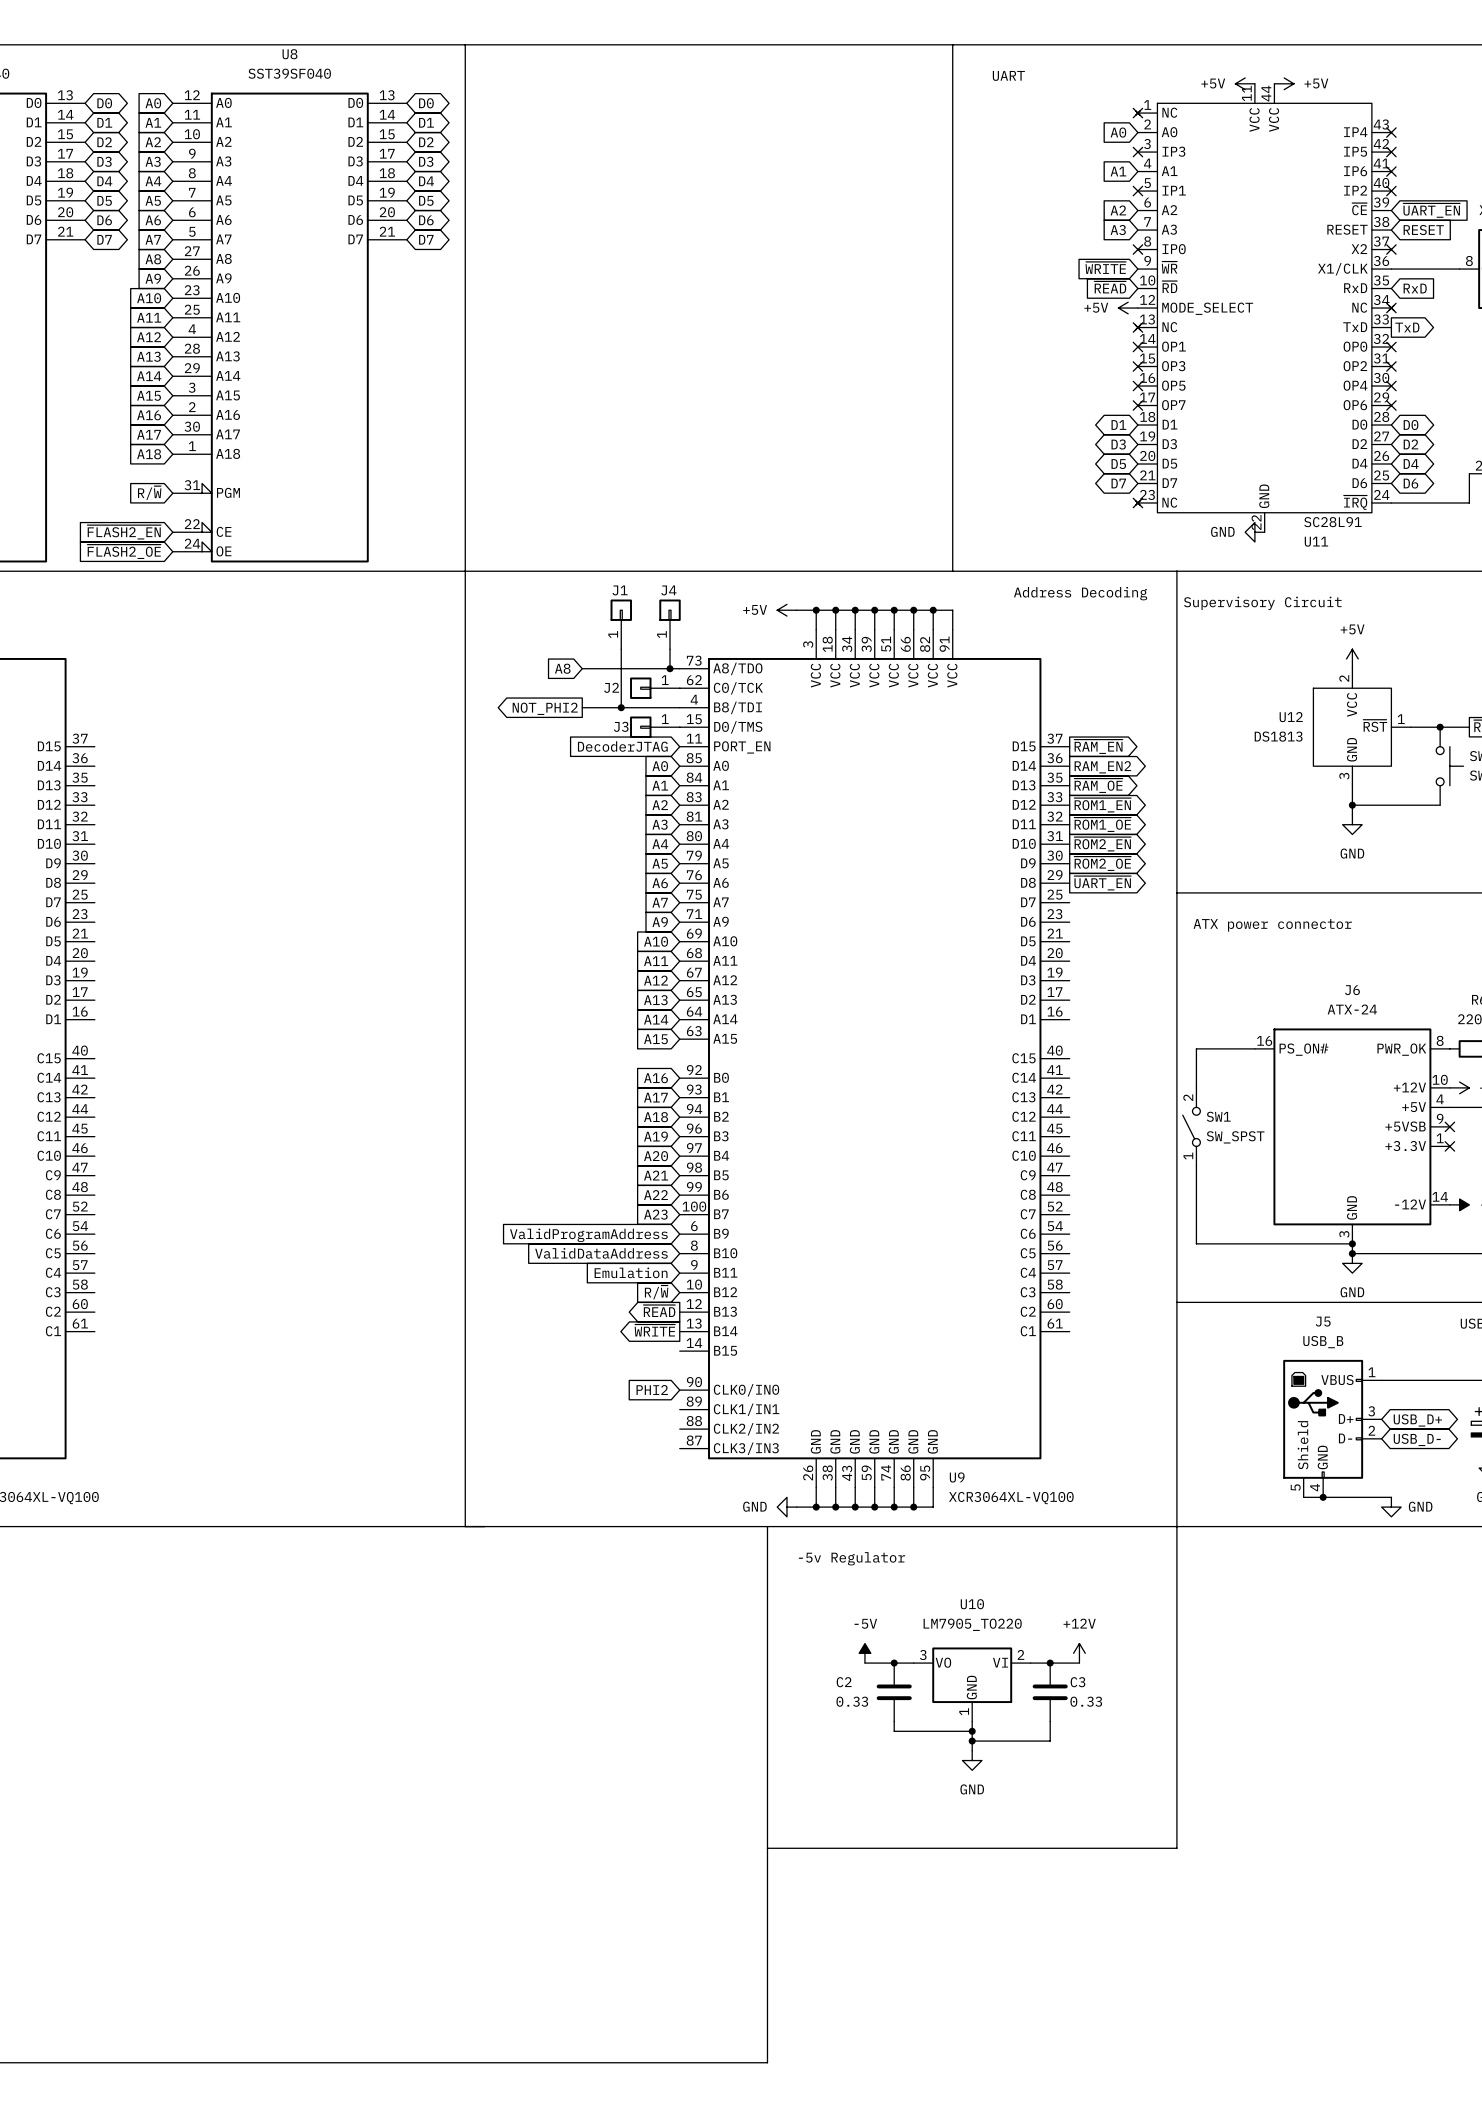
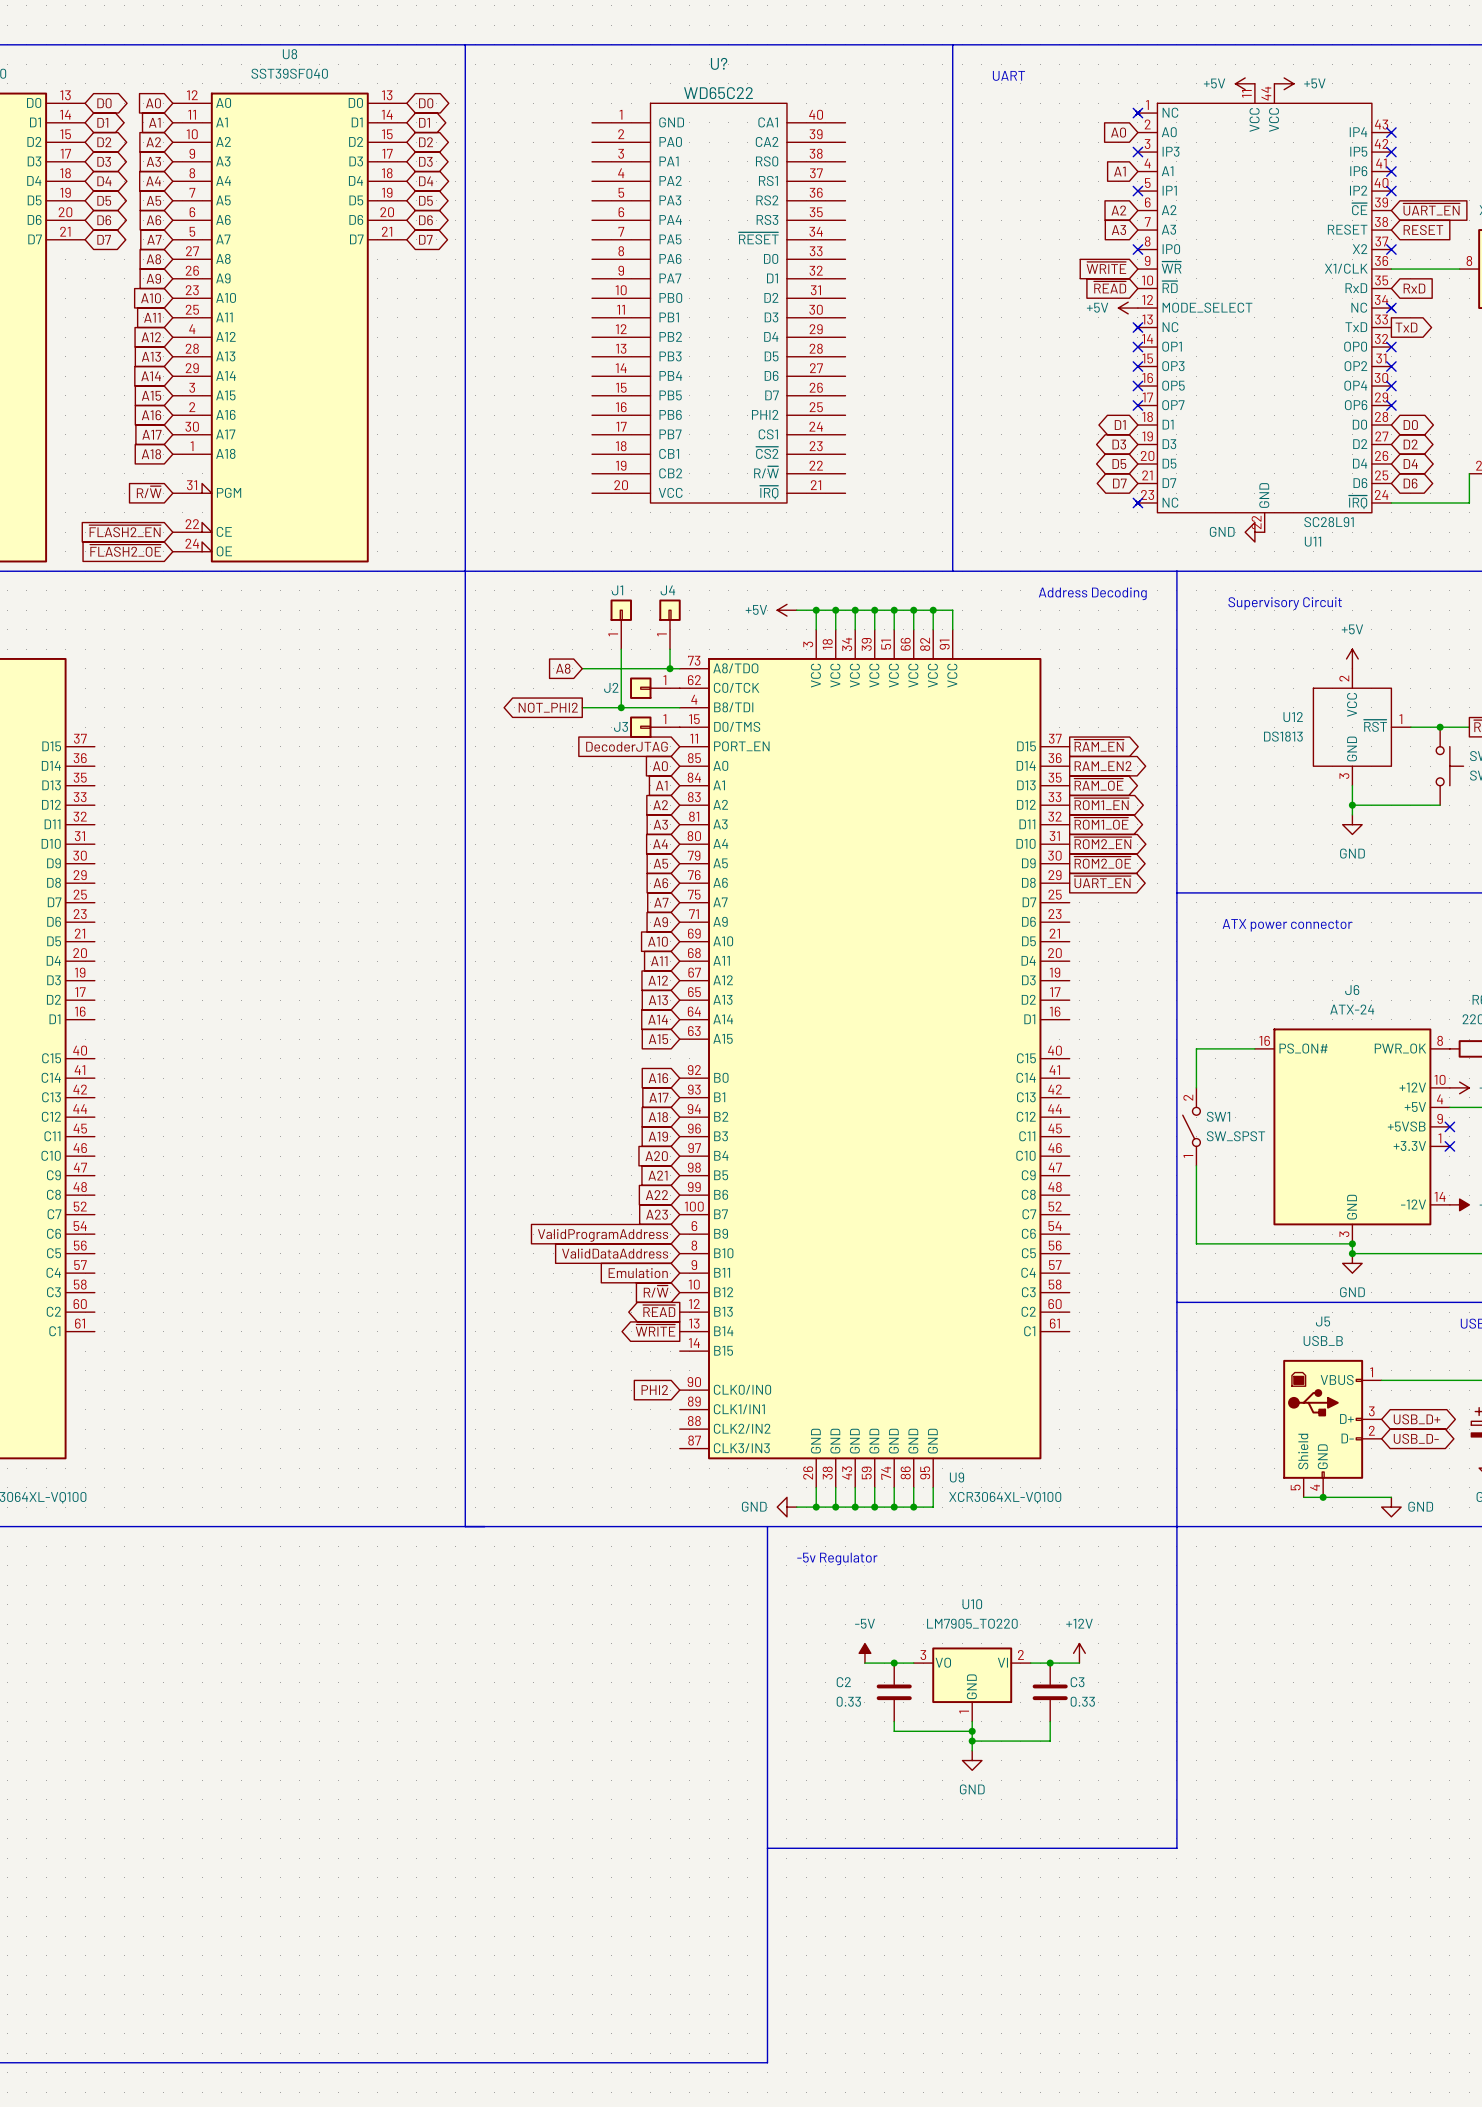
U?: none -> WD65C22 (718, 303)

